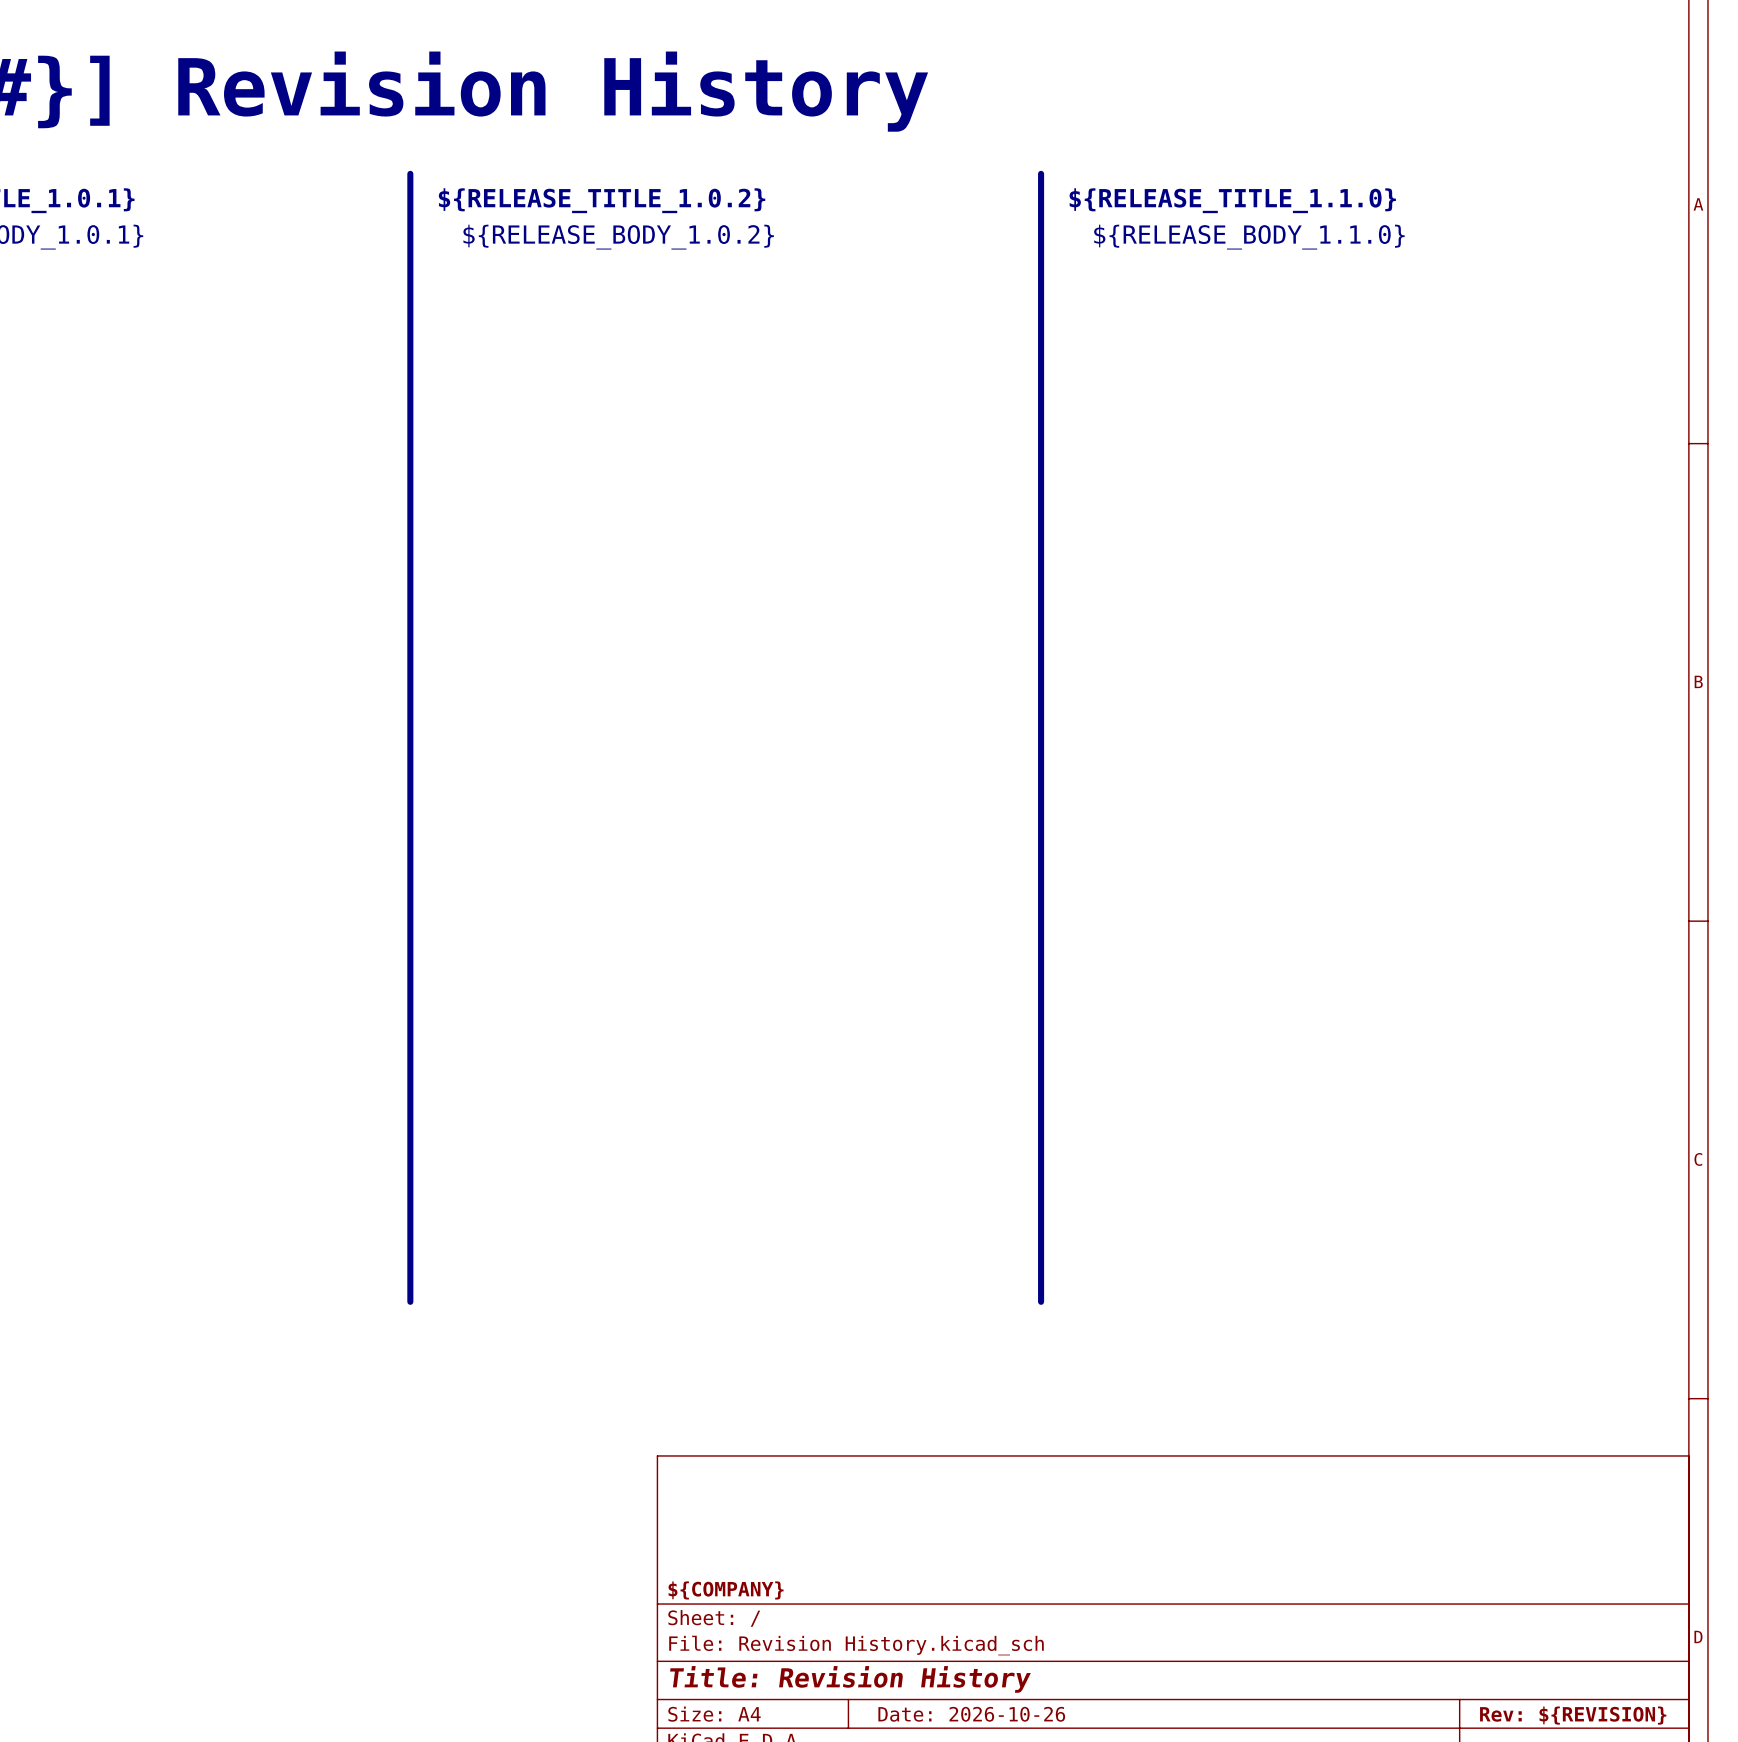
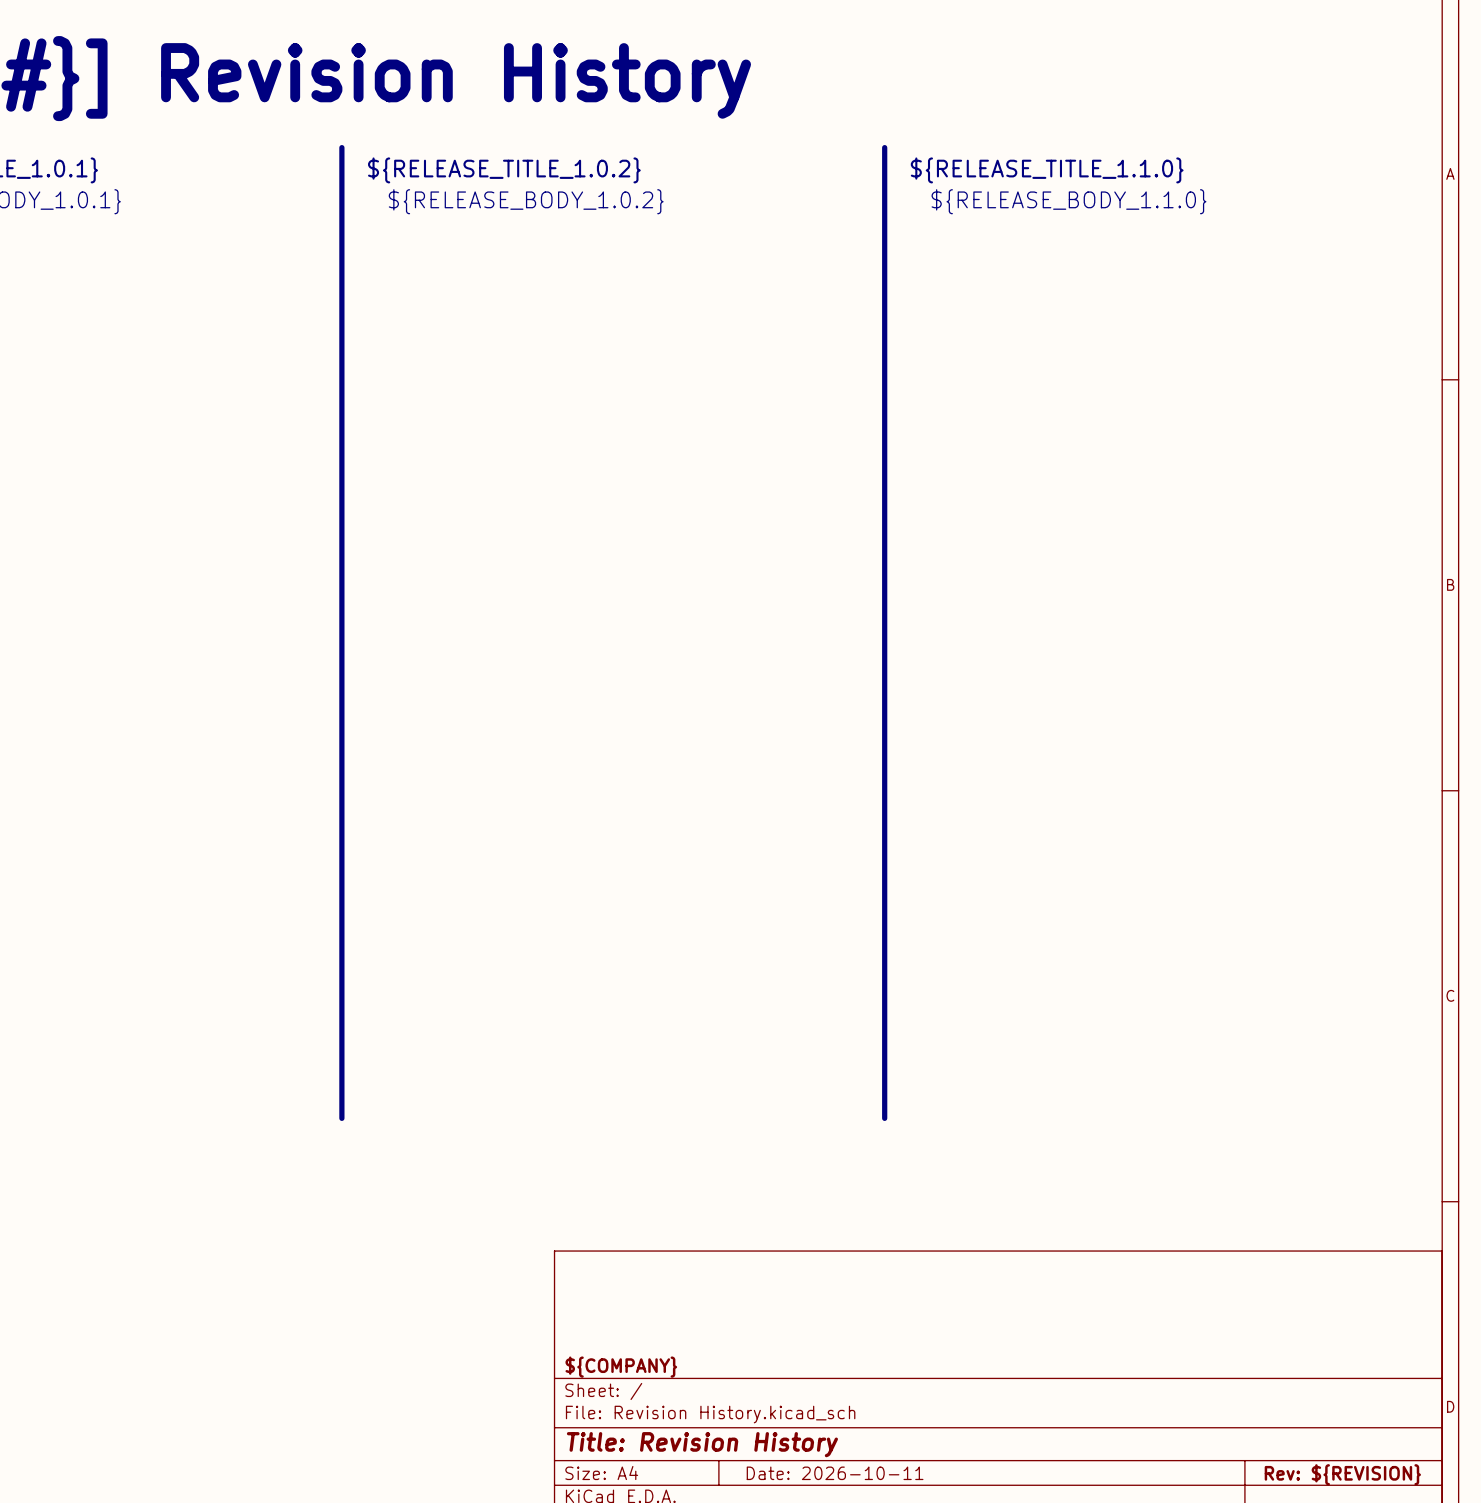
title block: Date: 2026-10-26 (971, 1714) -> Date: 2026-10-11 (835, 1473)

